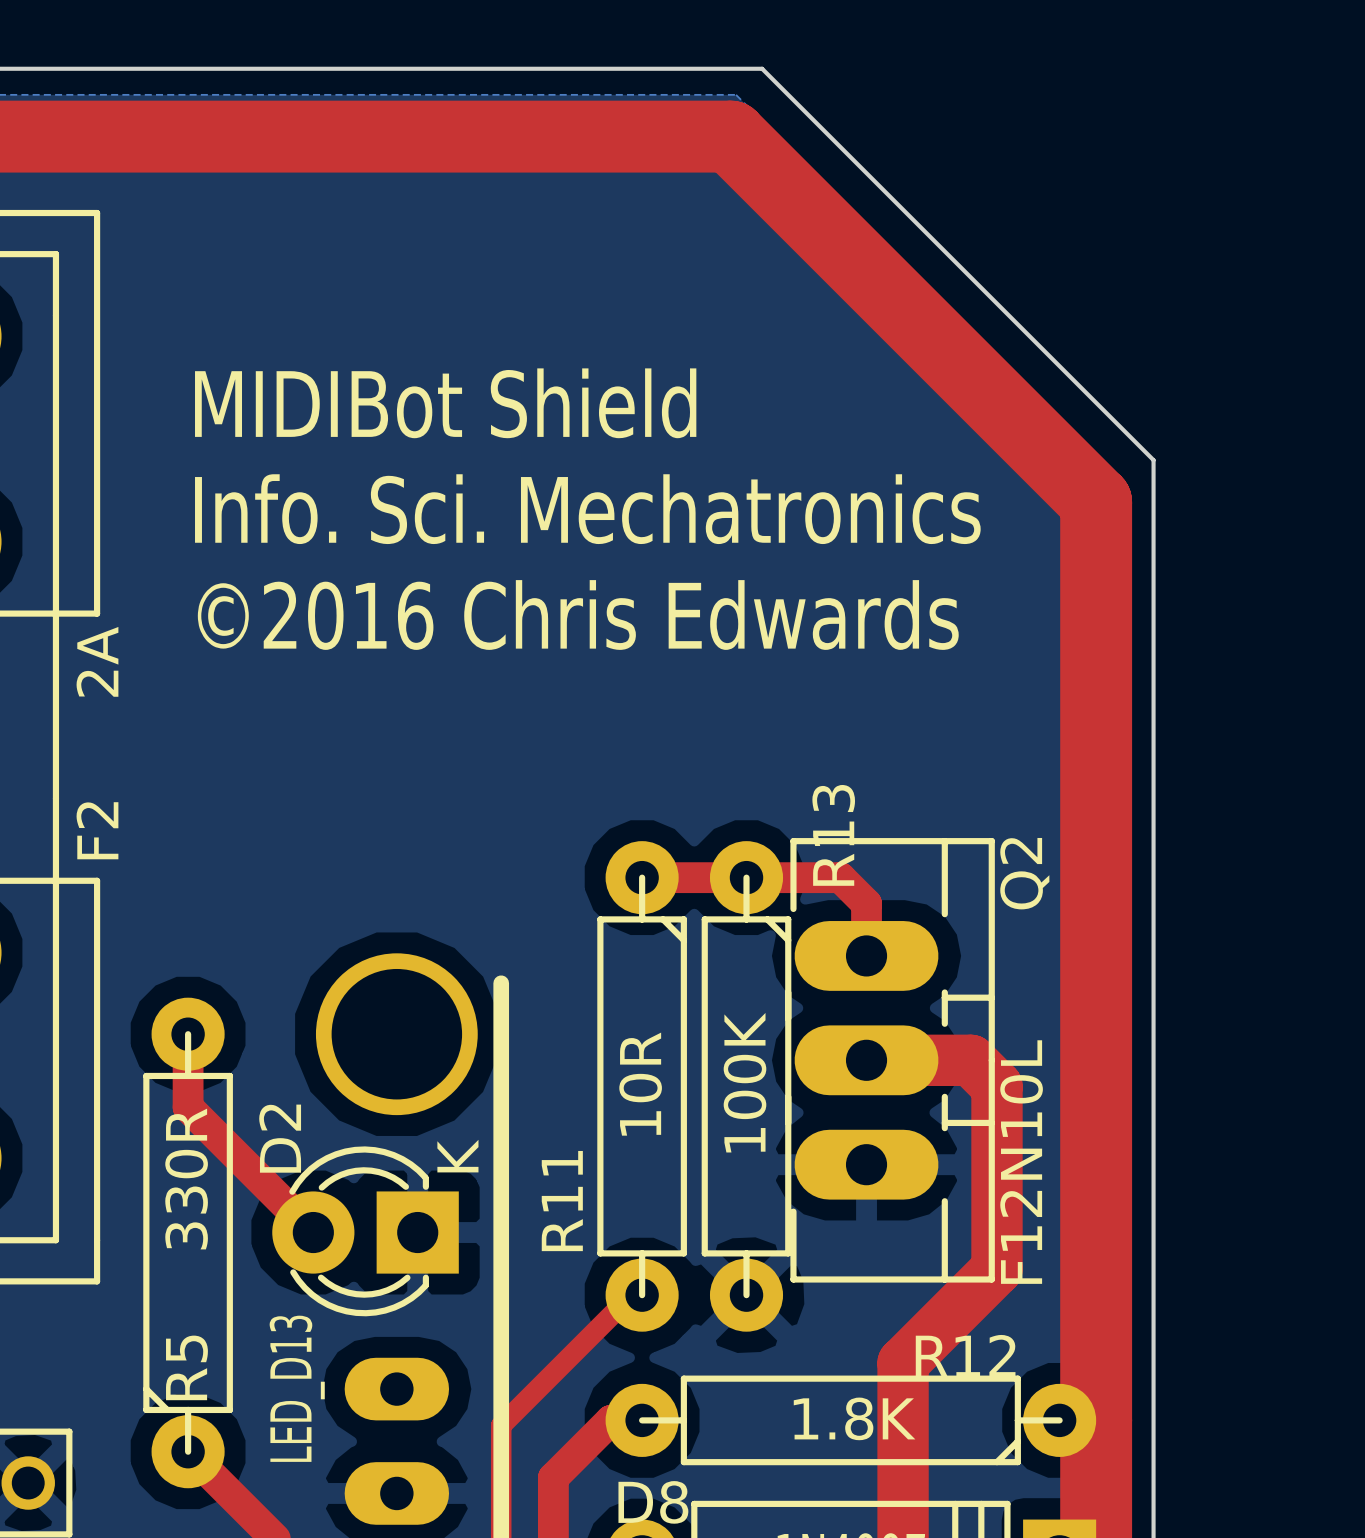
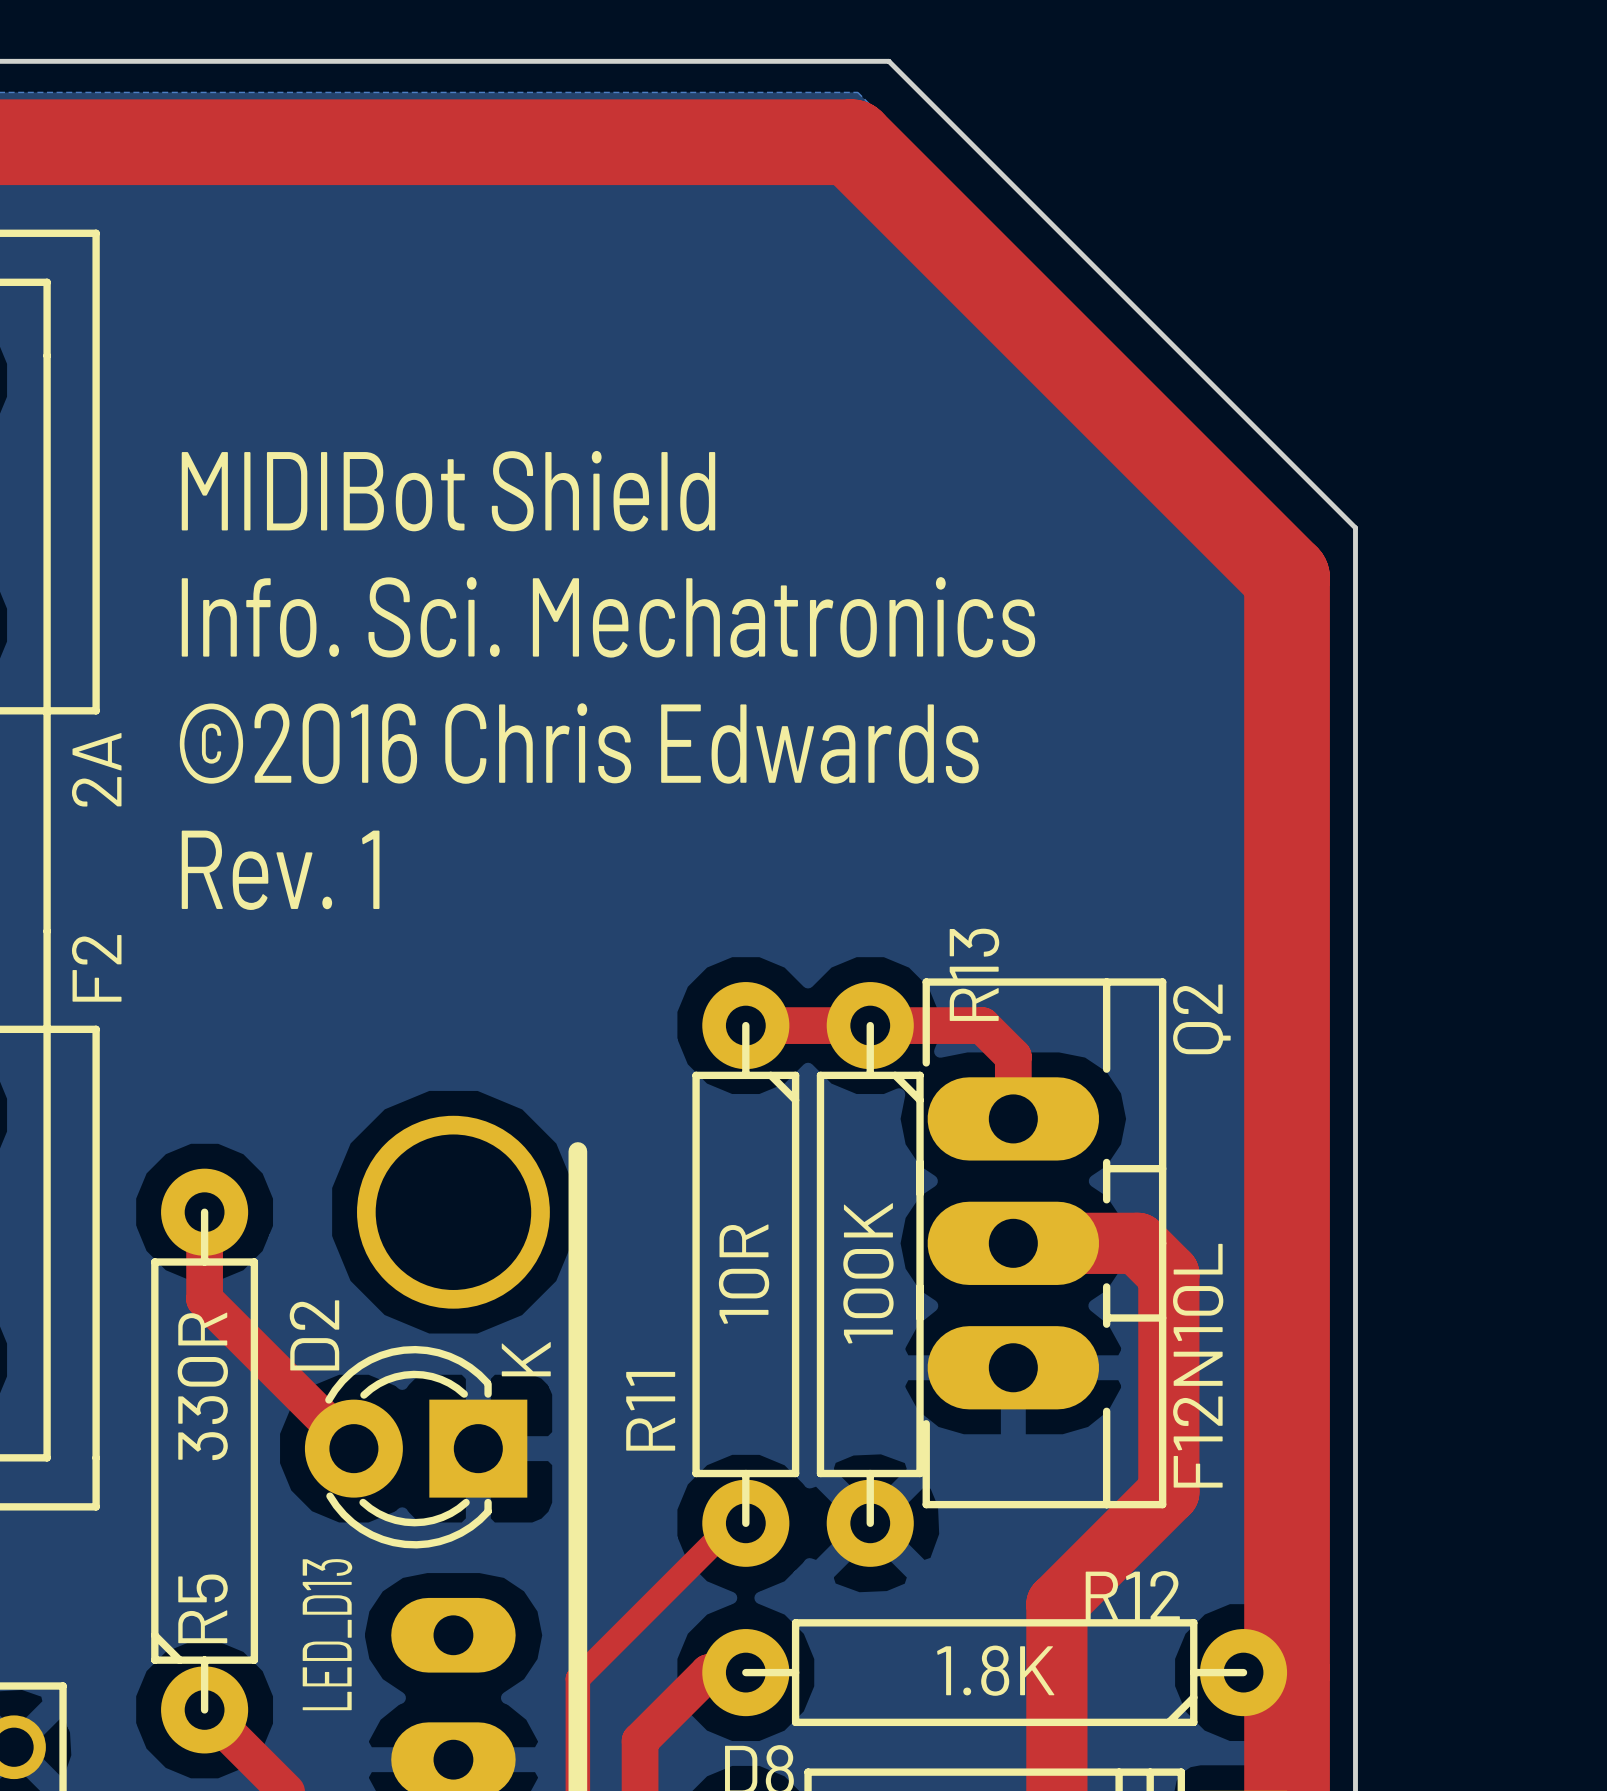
text position: MIDIBot Shield (445, 403) -> MIDIBot Shield (448, 491)
text position: Info. Sci. Mechatronics (587, 509) -> Info. Sci. Mechatronics (608, 617)
text position: ©2016 Chris Edwards (578, 614) -> ©2016 Chris Edwards (579, 743)
text: none -> Rev. 1 (280, 870)

